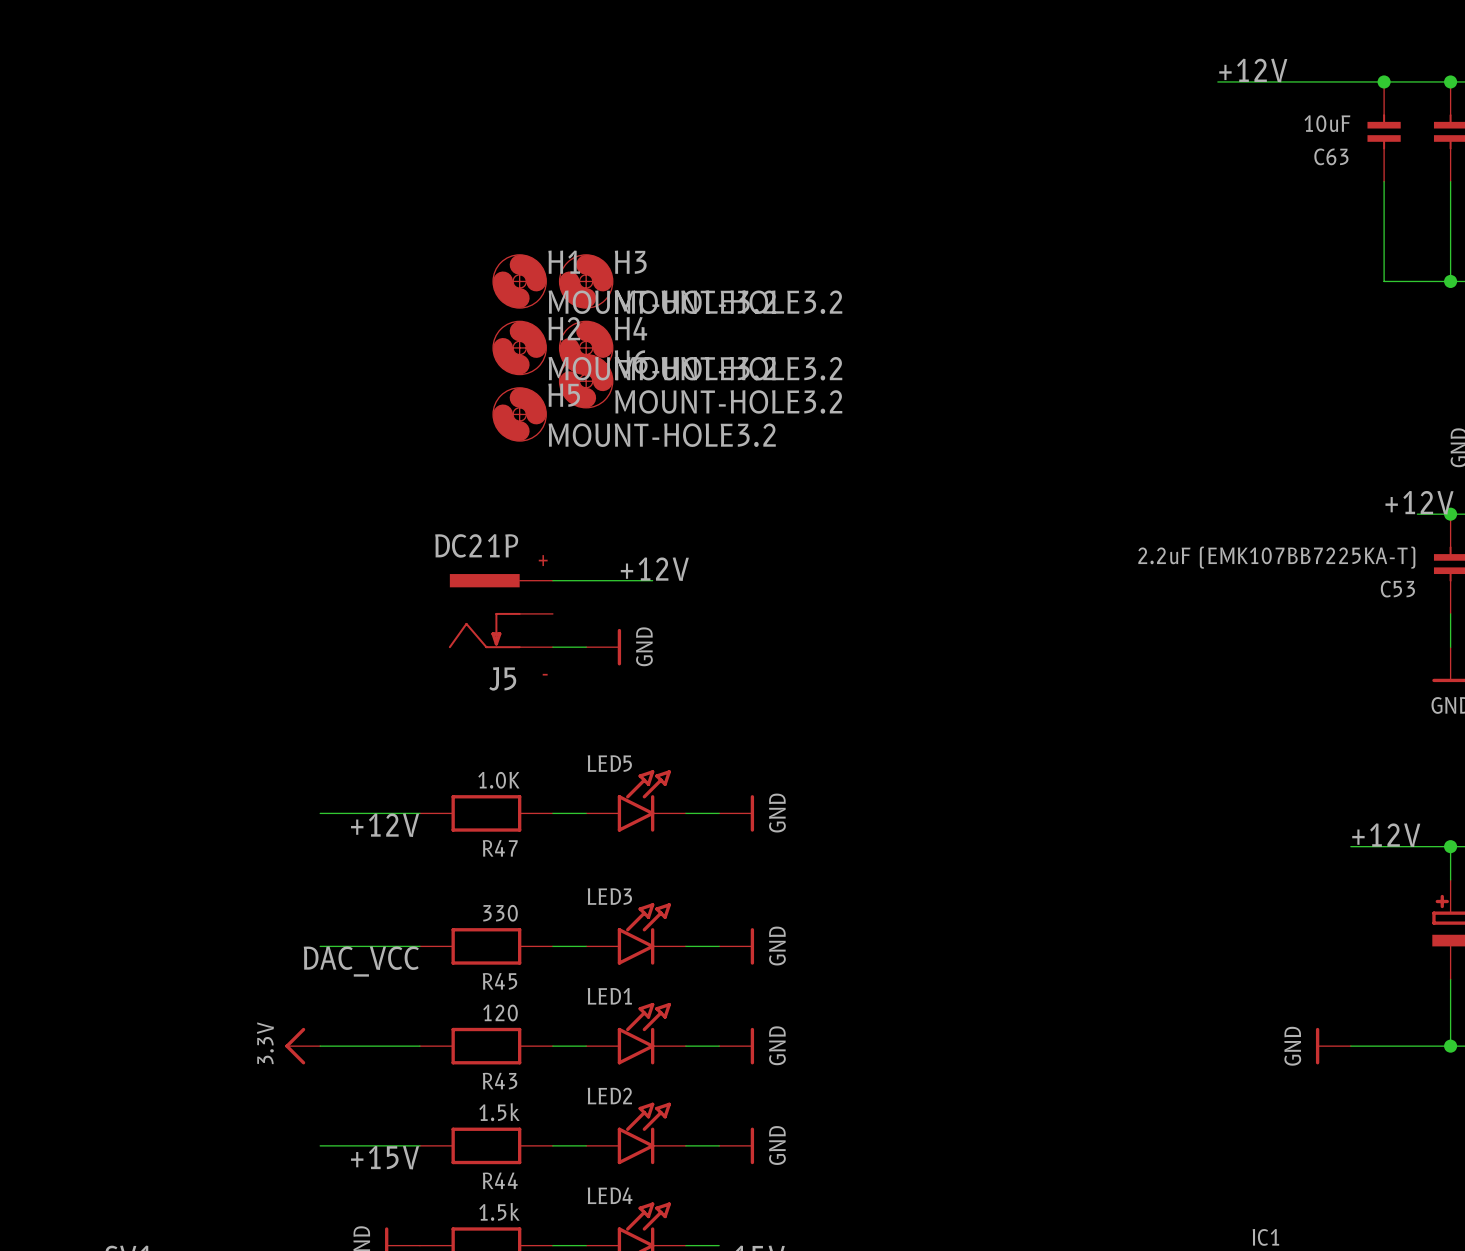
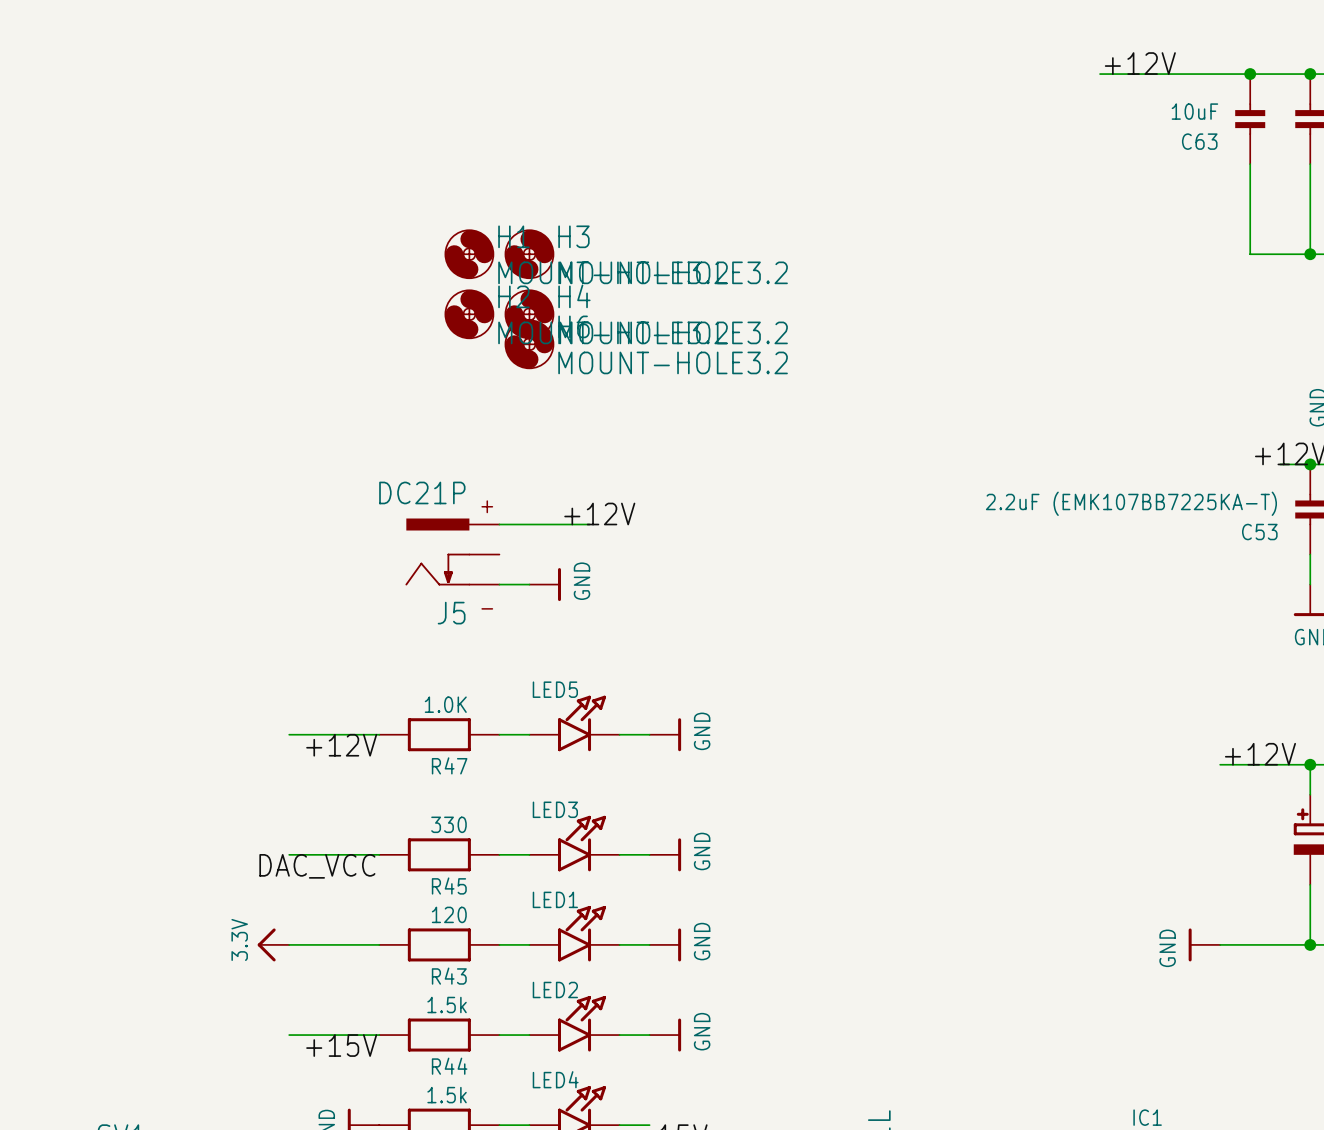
H5: MOUNT-HOLE3.2 (519, 414) -> none

